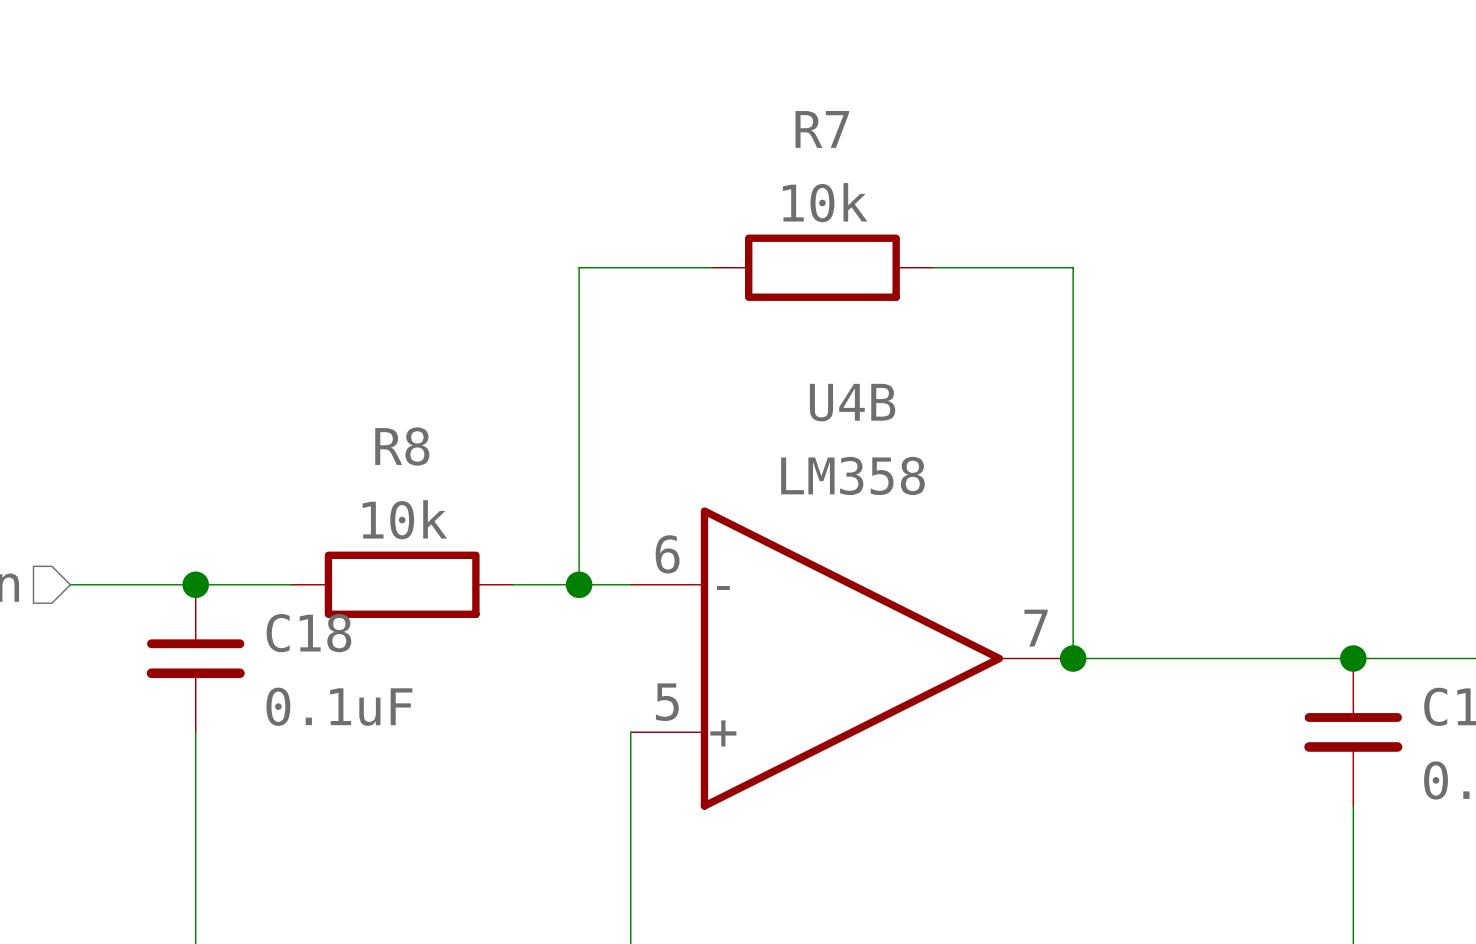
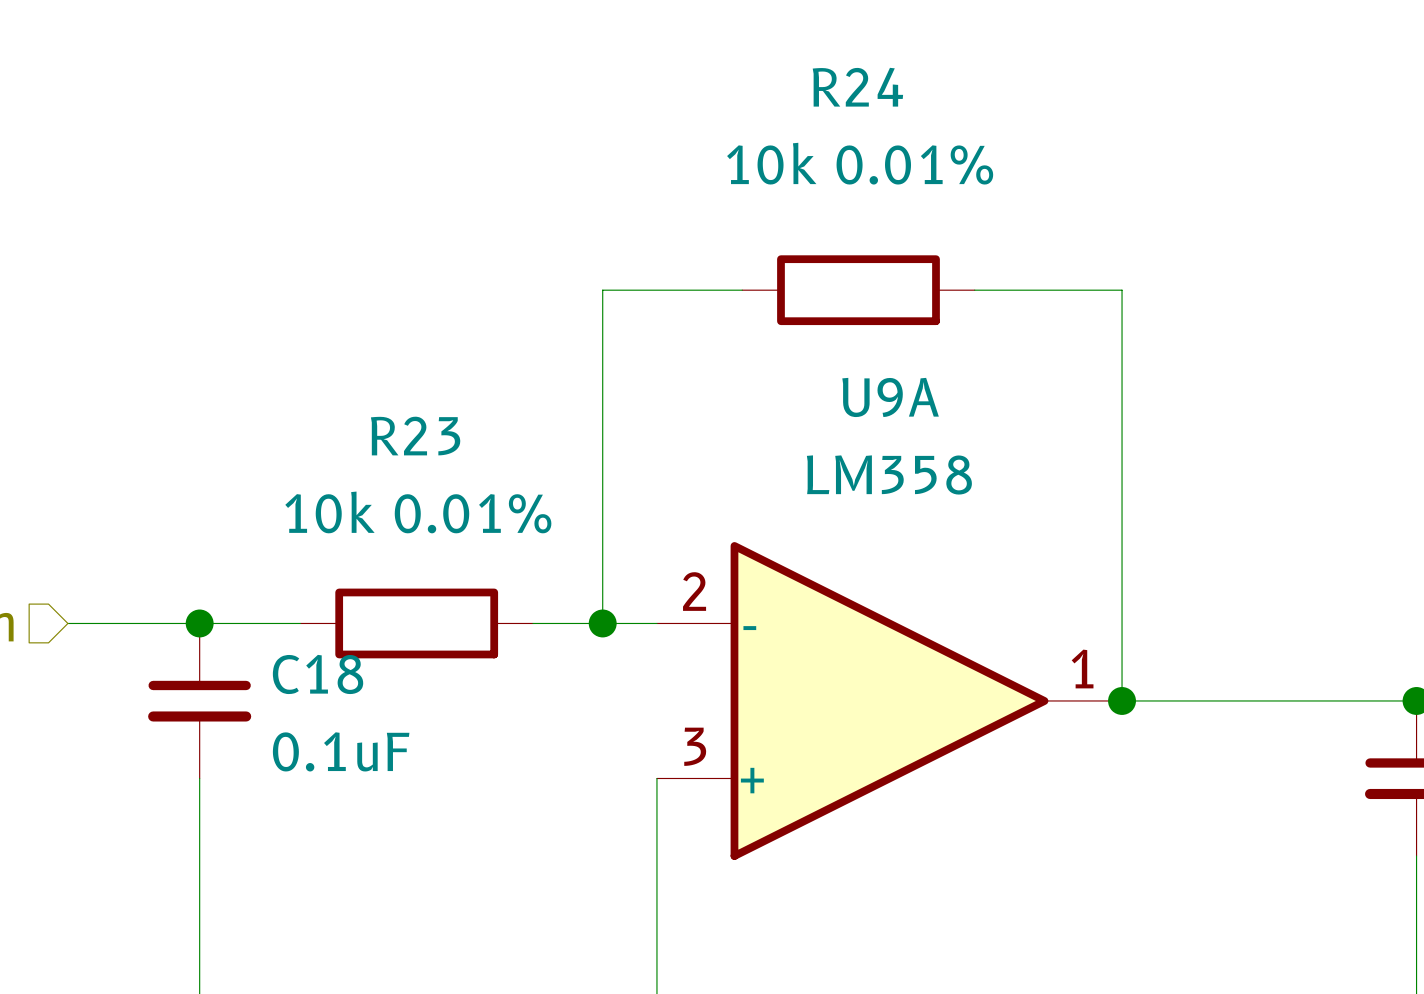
R7 name: R7 (822, 129) -> R24 (857, 87)
R7 value: 10k (825, 202) -> 10k 0.01% (860, 163)
U4B name: U4B (852, 402) -> U9A (890, 397)
R8 name: R8 (402, 446) -> R23 (415, 436)
U4B value position: LM358 (852, 475) -> LM358 (889, 474)
R8 value: 10k (404, 519) -> 10k 0.01% (418, 512)
U4B pin number: 6 (667, 554) -> 2 (694, 591)
U4B pin number: 7 (1036, 628) -> 1 (1082, 669)
U4B pin number: 5 (667, 702) -> 3 (695, 746)

